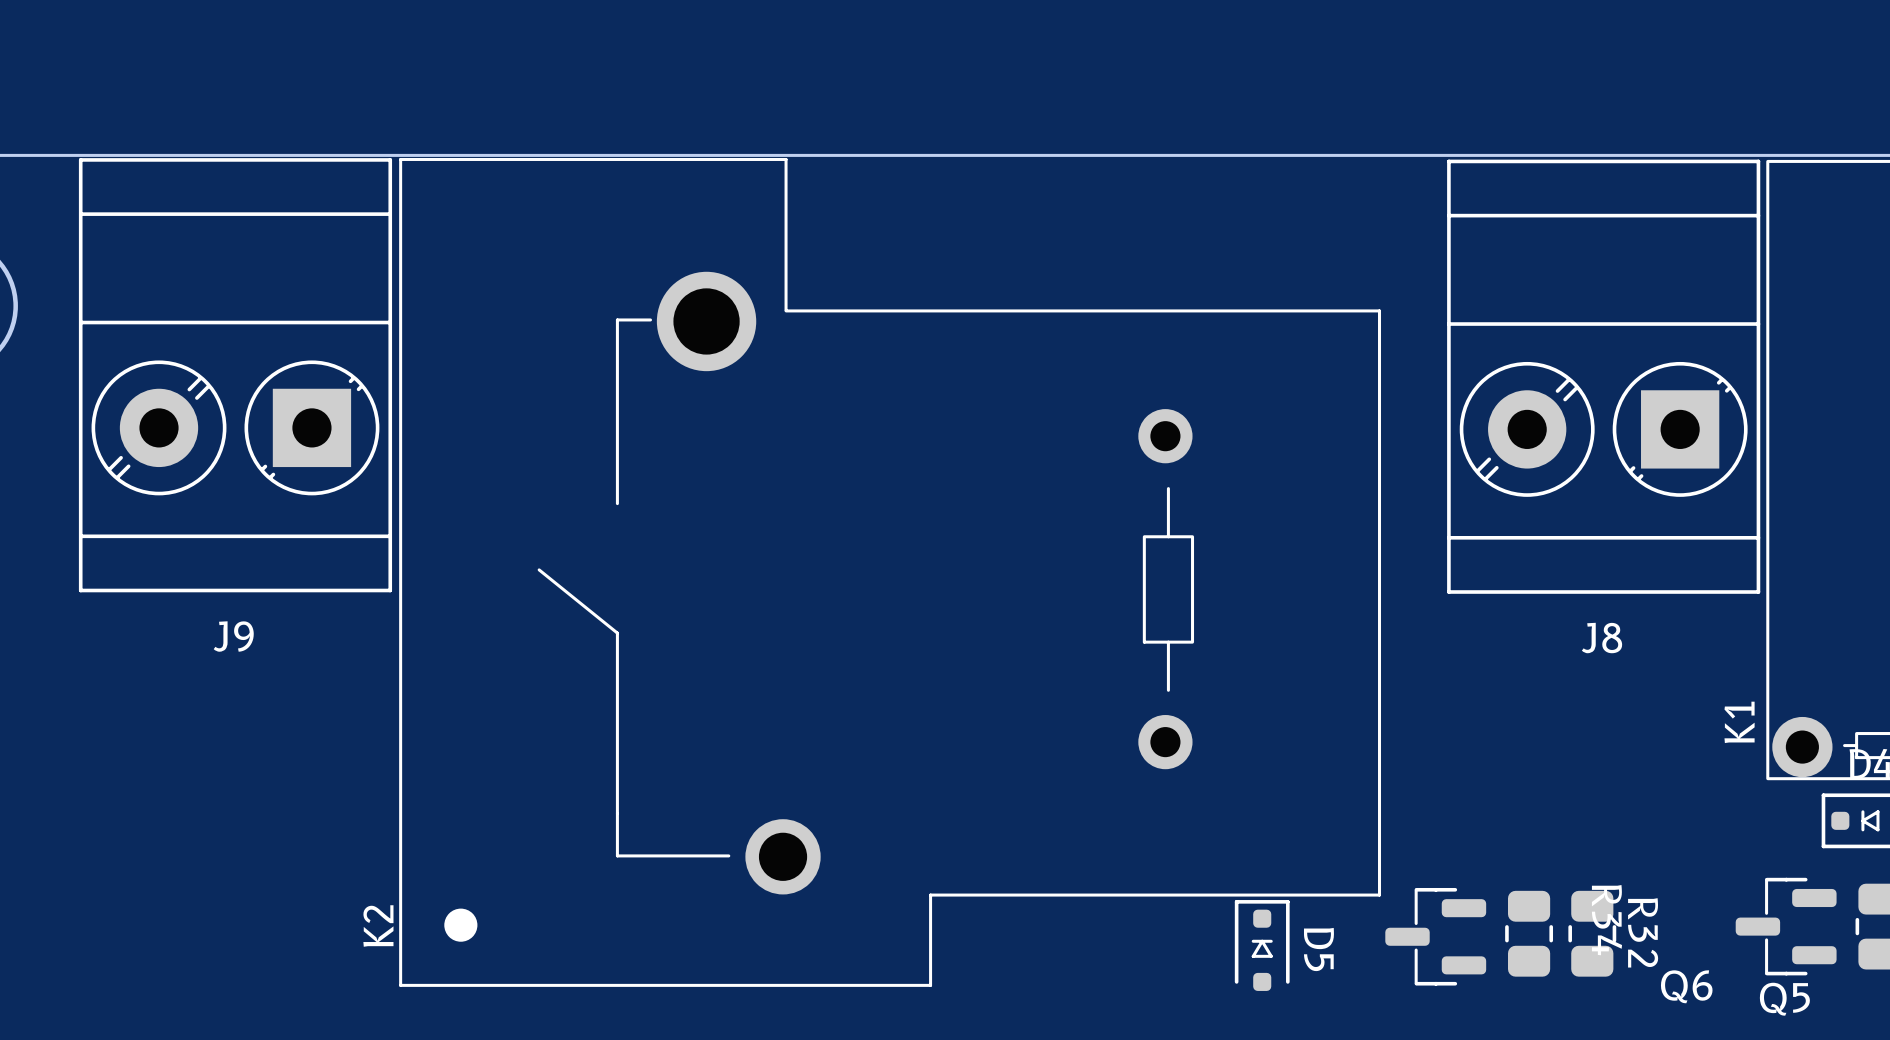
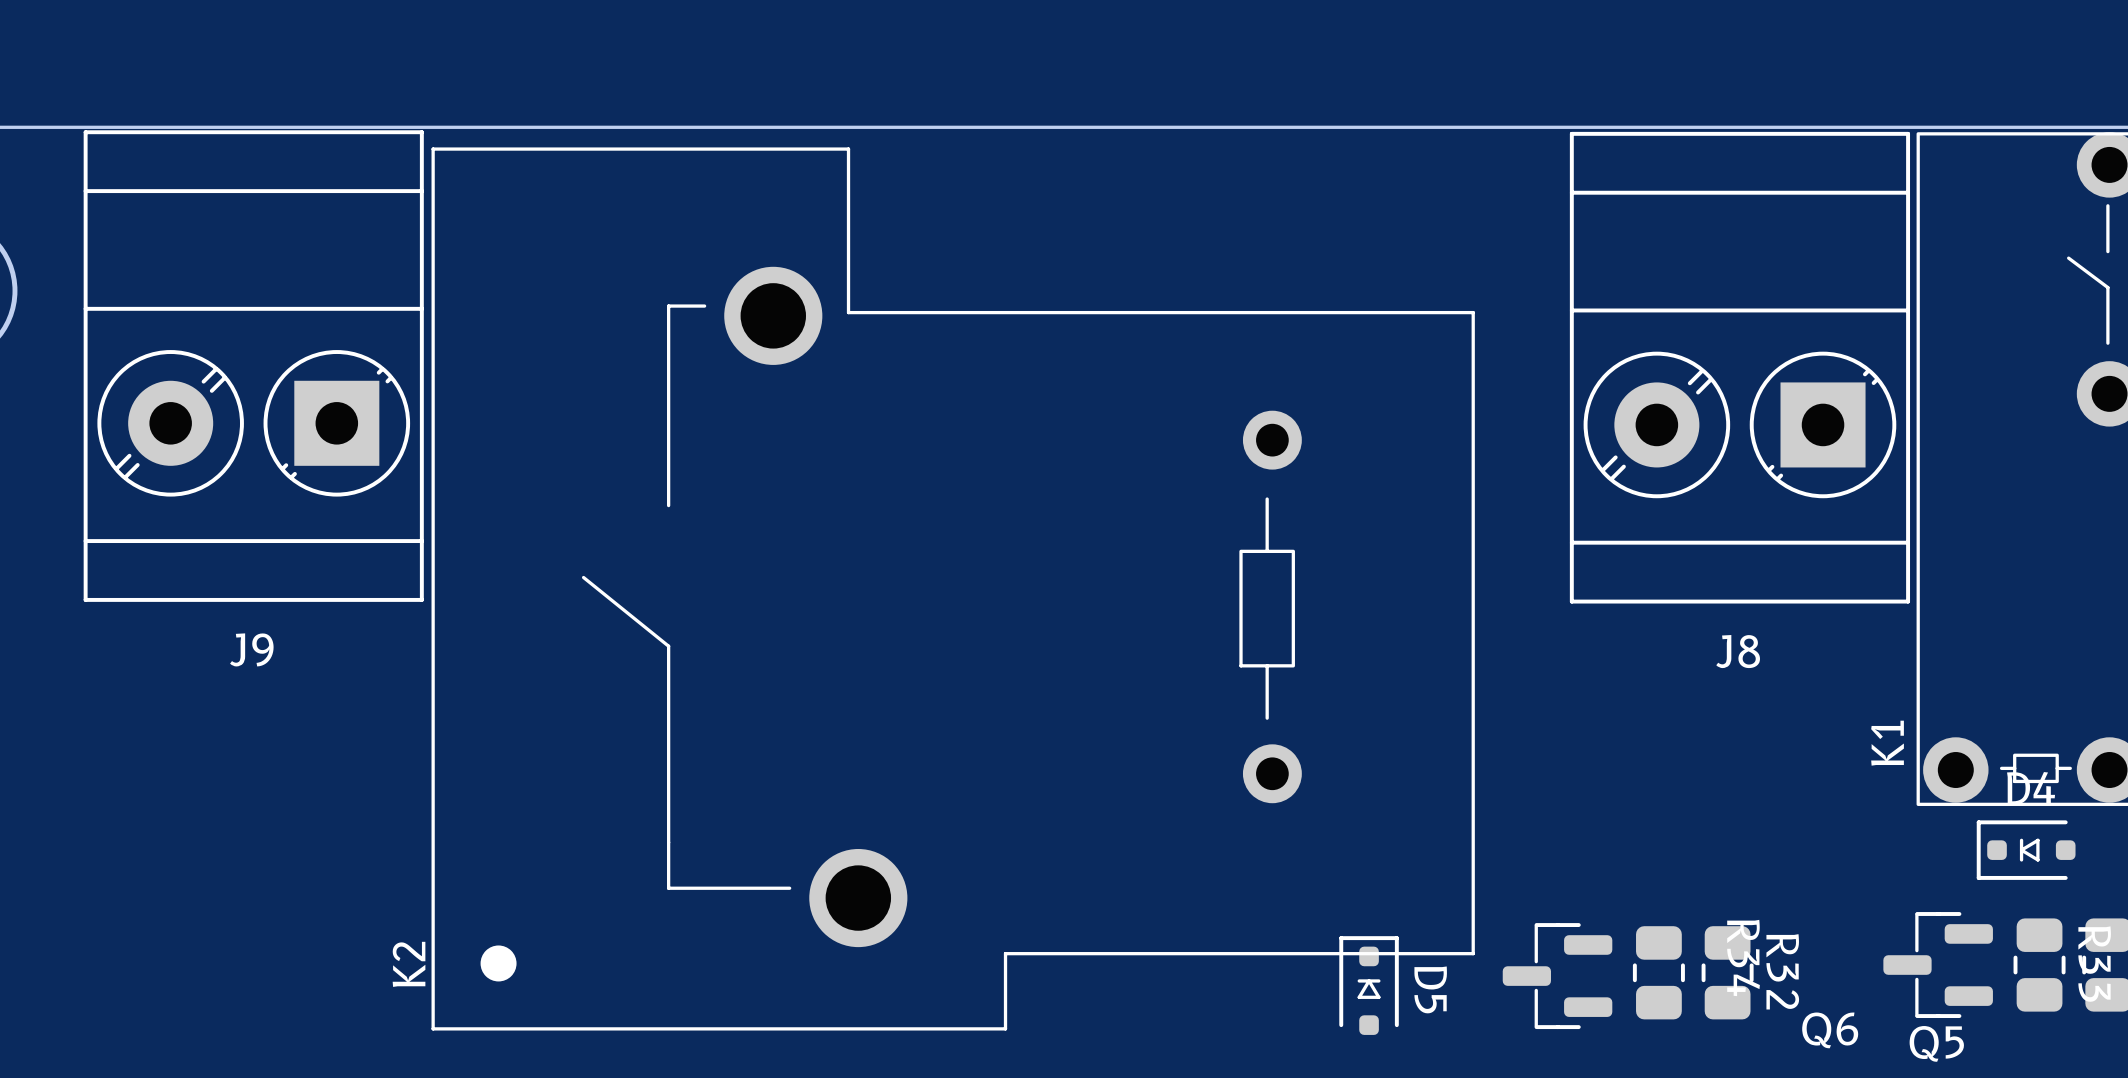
K2 footprint: [399, 157, 1382, 987] -> [431, 147, 1475, 1031]

